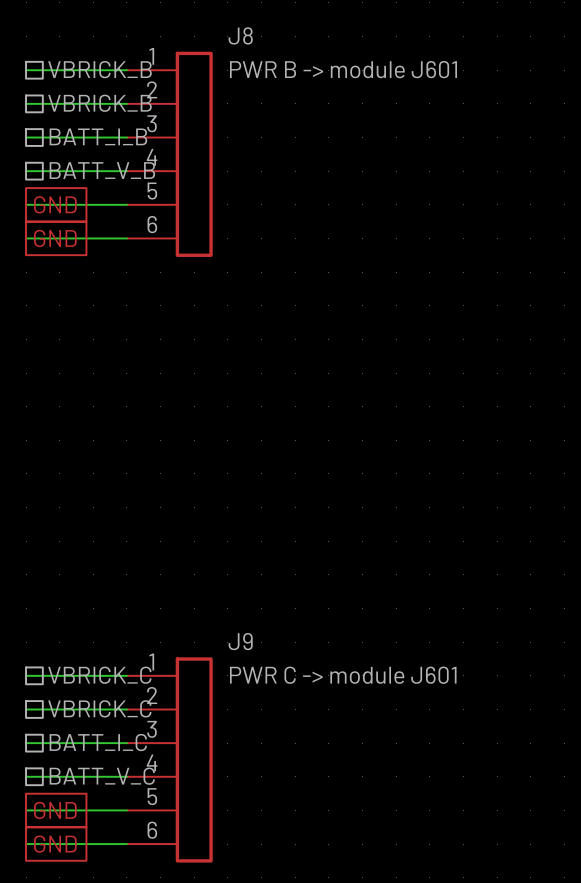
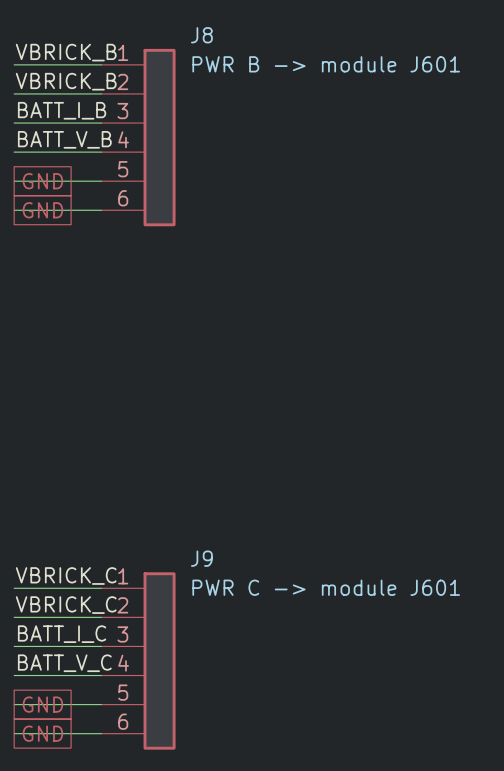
label: none -> VBRICK_B (66, 52)
hierarchical label: VBRICK_B (100, 69) -> none
label: none -> VBRICK_B (66, 81)
hierarchical label: VBRICK_B (100, 103) -> none
label: none -> BATT_I_B (62, 110)
hierarchical label: BATT_I_B (98, 136) -> none
label: none -> BATT_V_B (64, 139)
hierarchical label: BATT_V_B (102, 170) -> none
label: none -> VBRICK_C (66, 576)
hierarchical label: VBRICK_C (99, 675) -> none
label: none -> VBRICK_C (66, 605)
hierarchical label: VBRICK_C (99, 708) -> none
label: none -> BATT_I_C (62, 634)
hierarchical label: BATT_I_C (98, 742) -> none
label: none -> BATT_V_C (64, 663)
hierarchical label: BATT_V_C (102, 776) -> none

